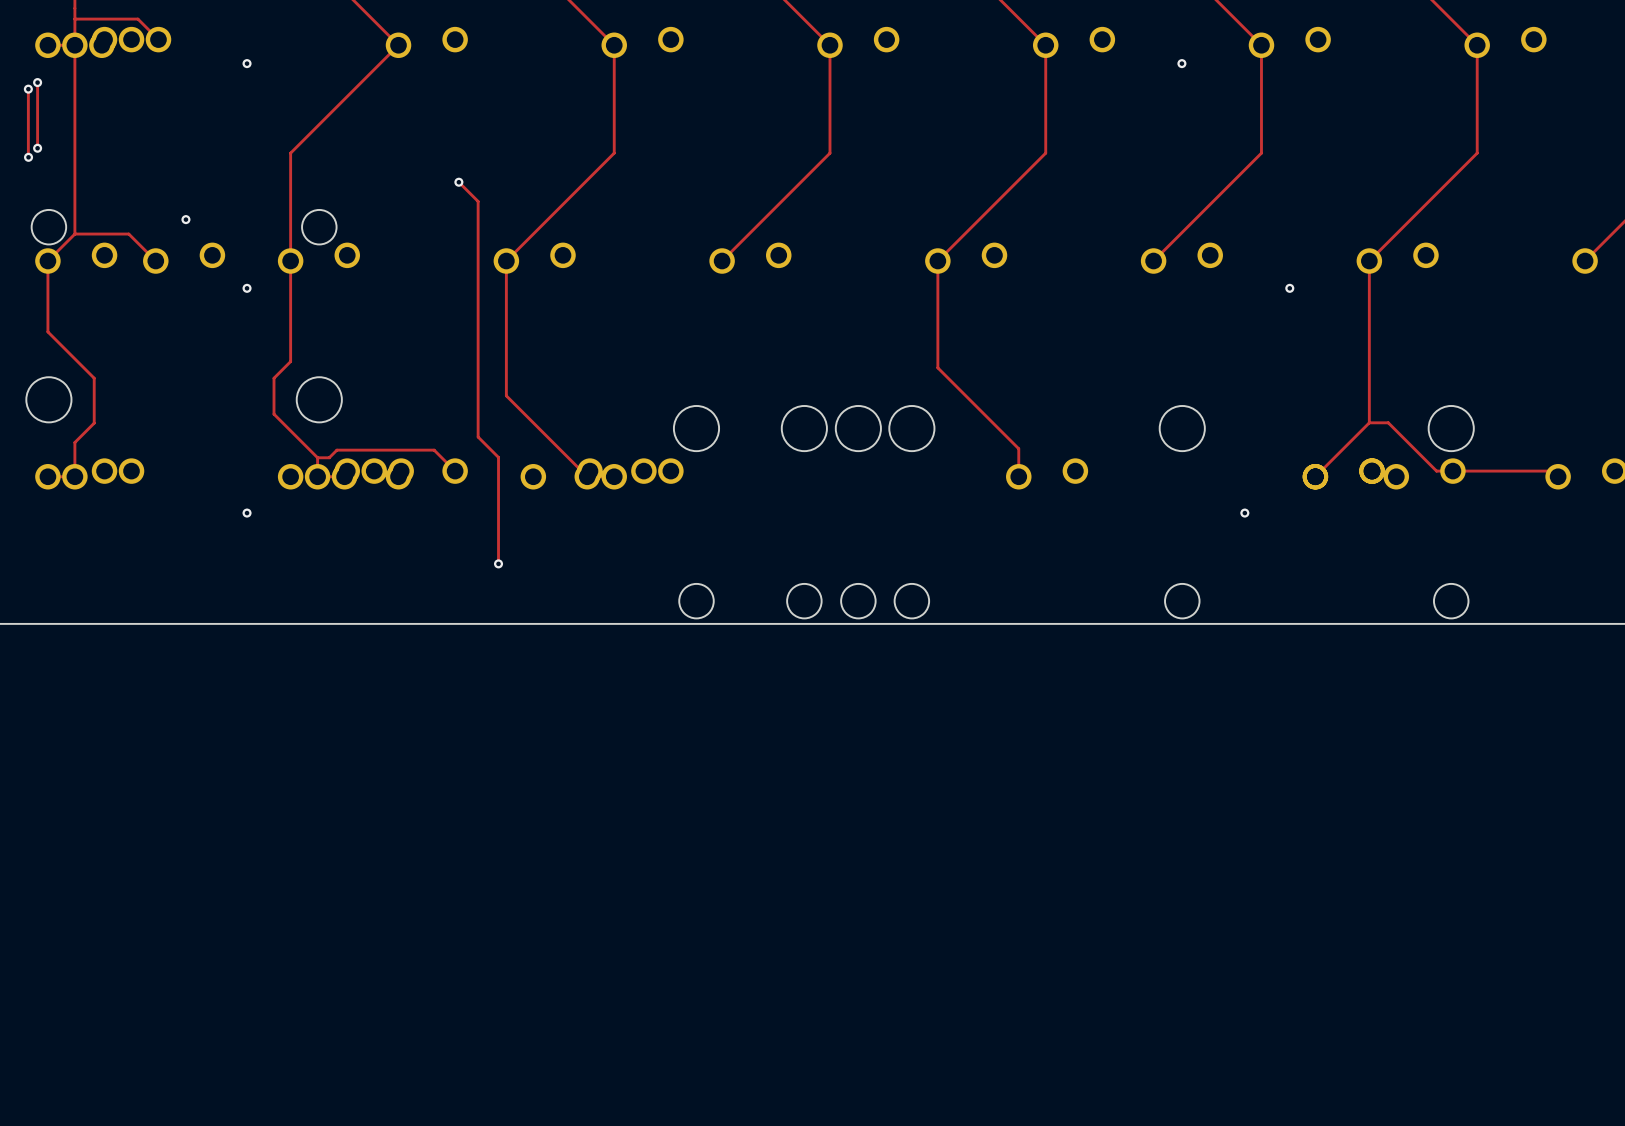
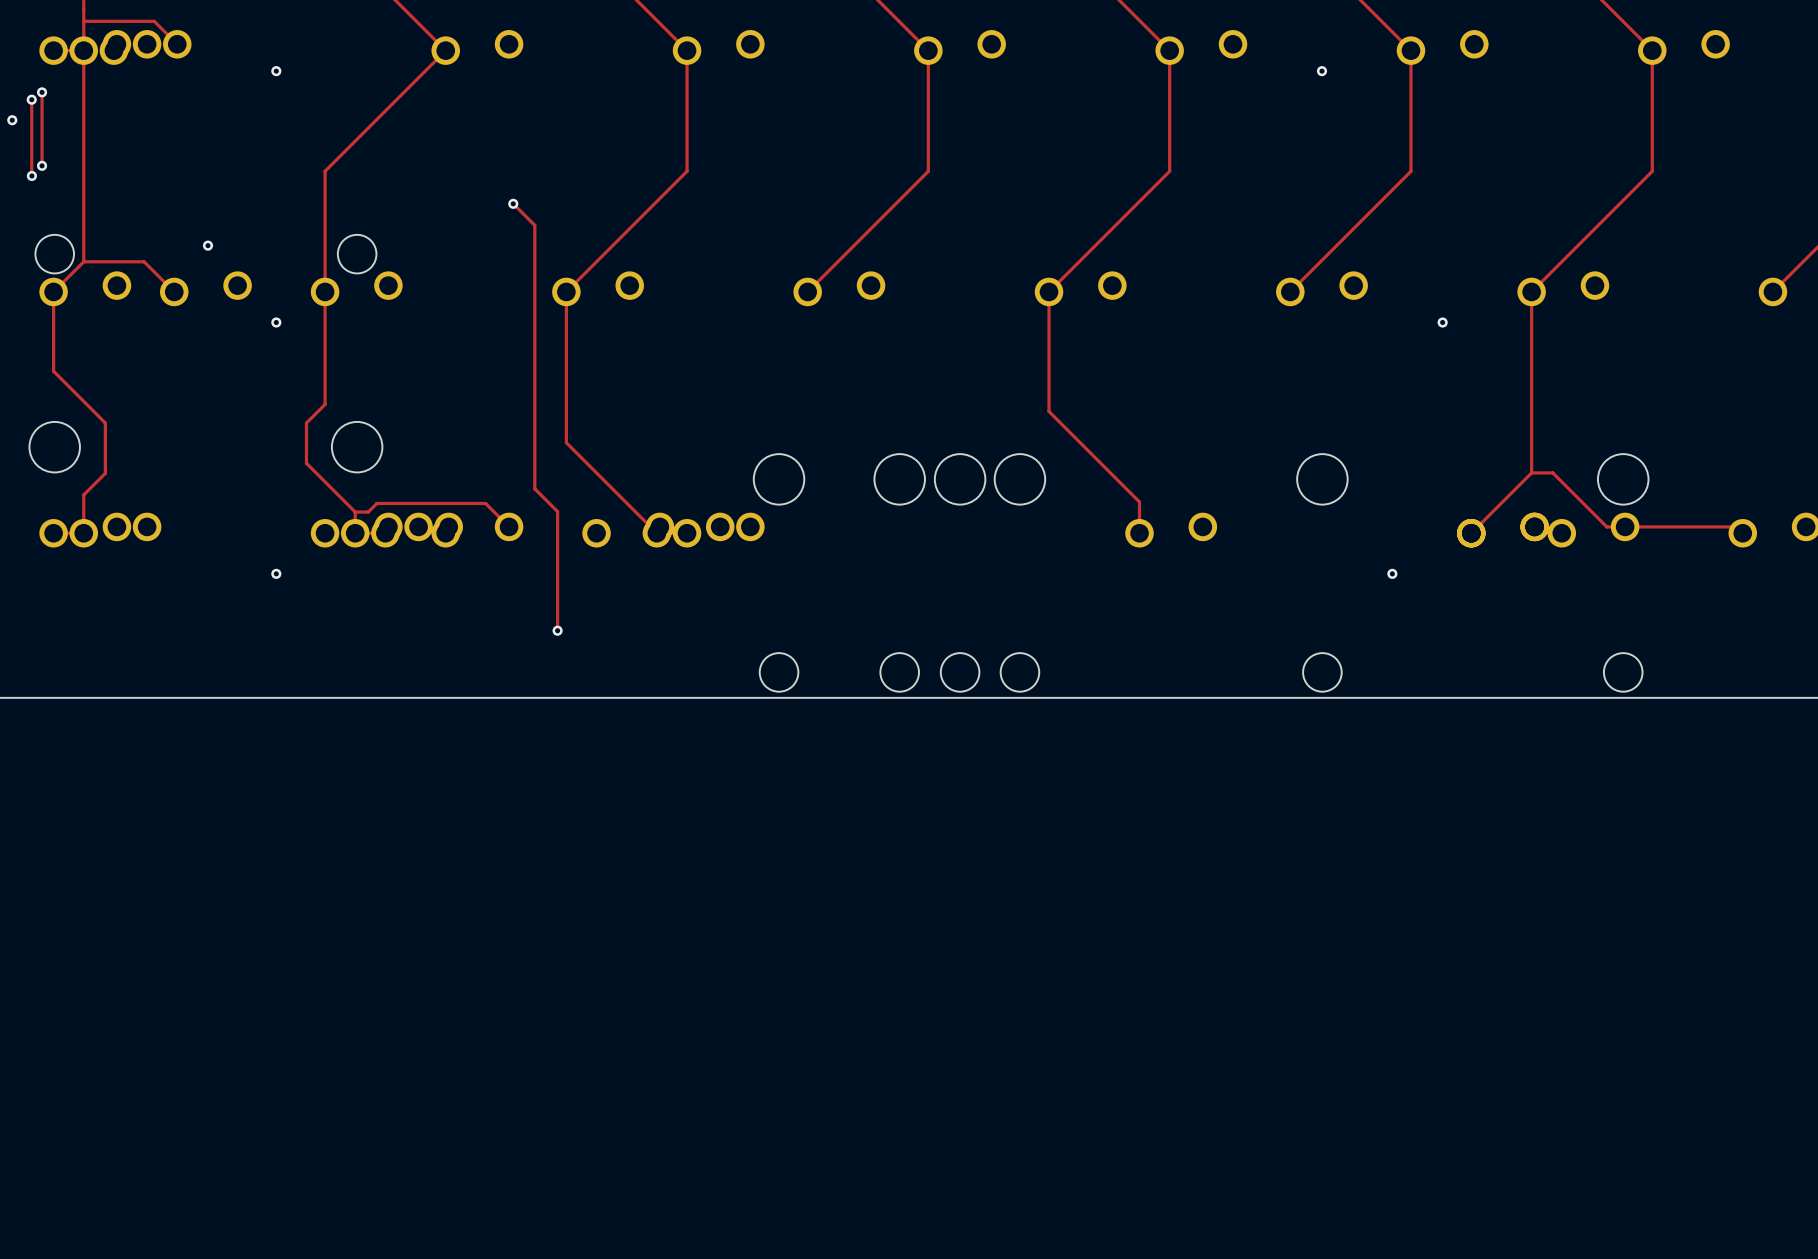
via: none -> (12, 120)

